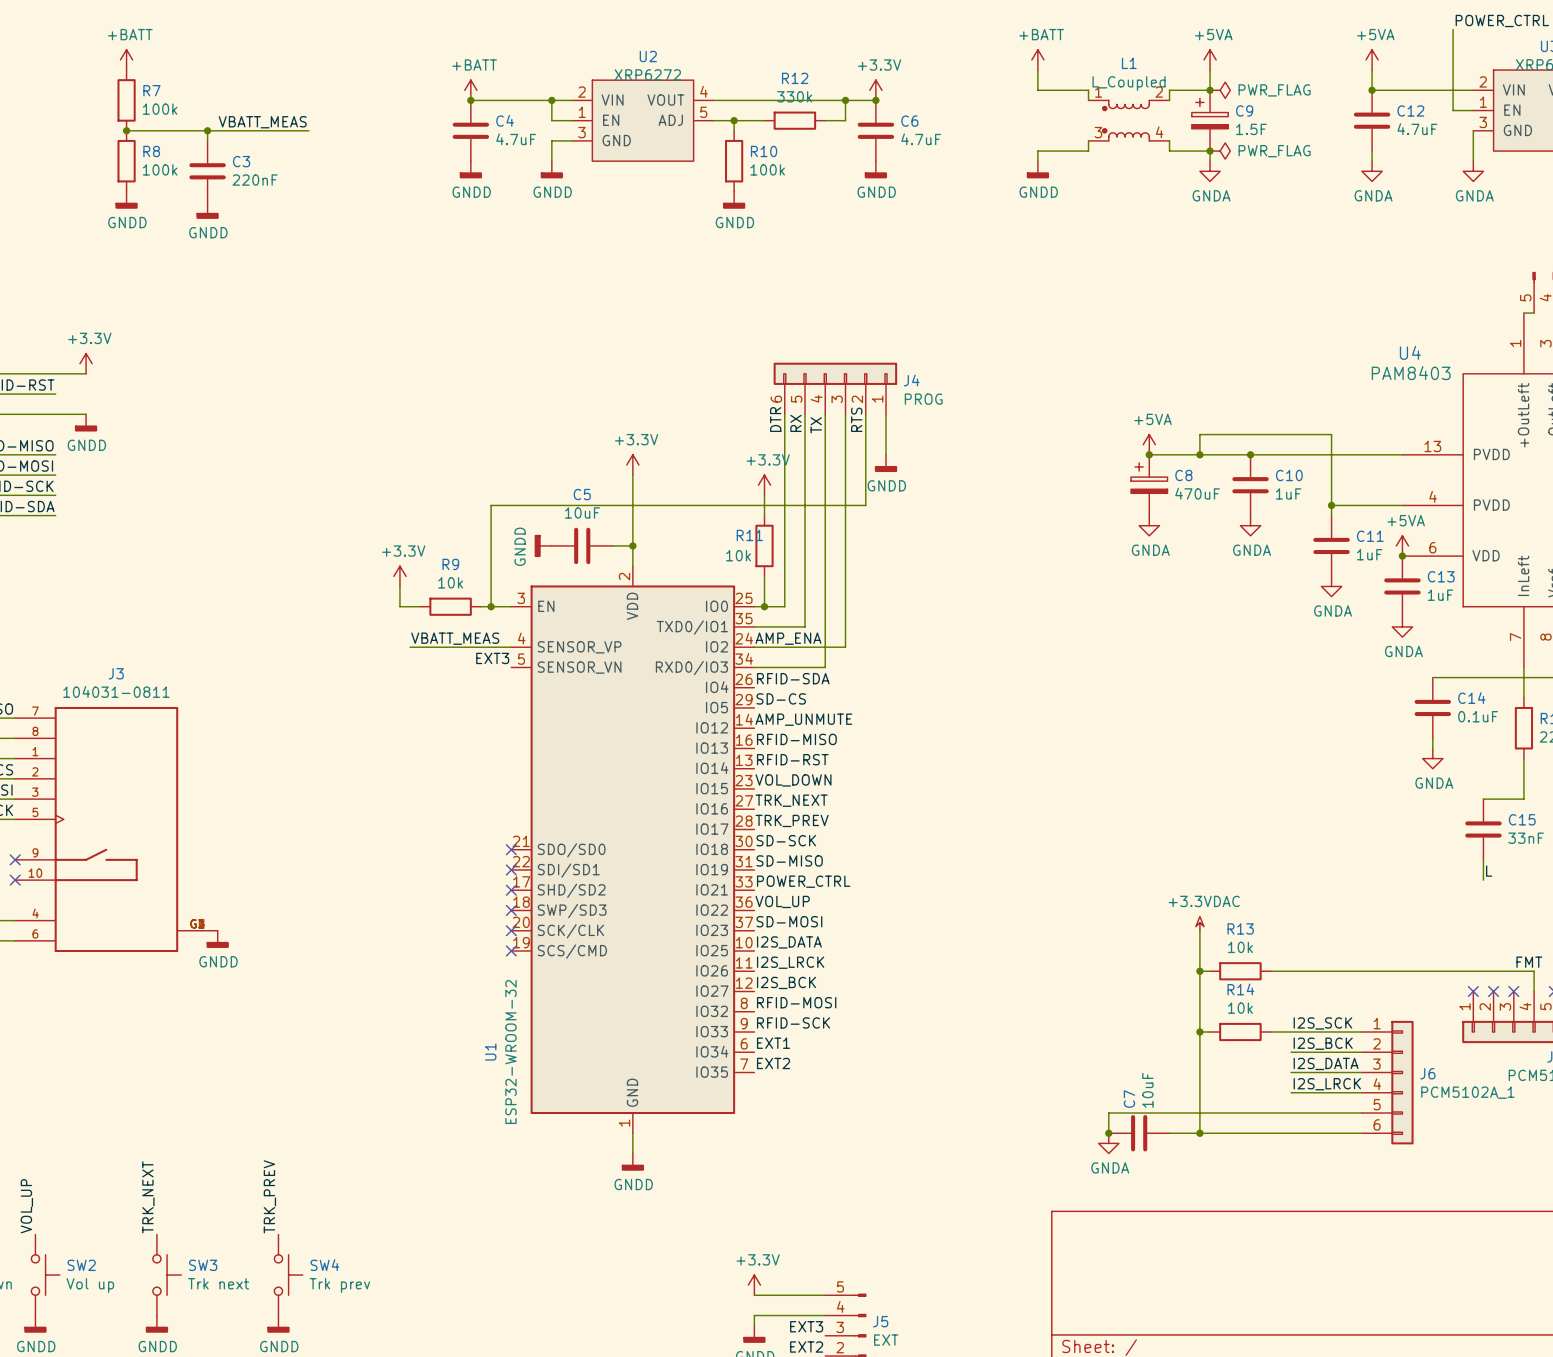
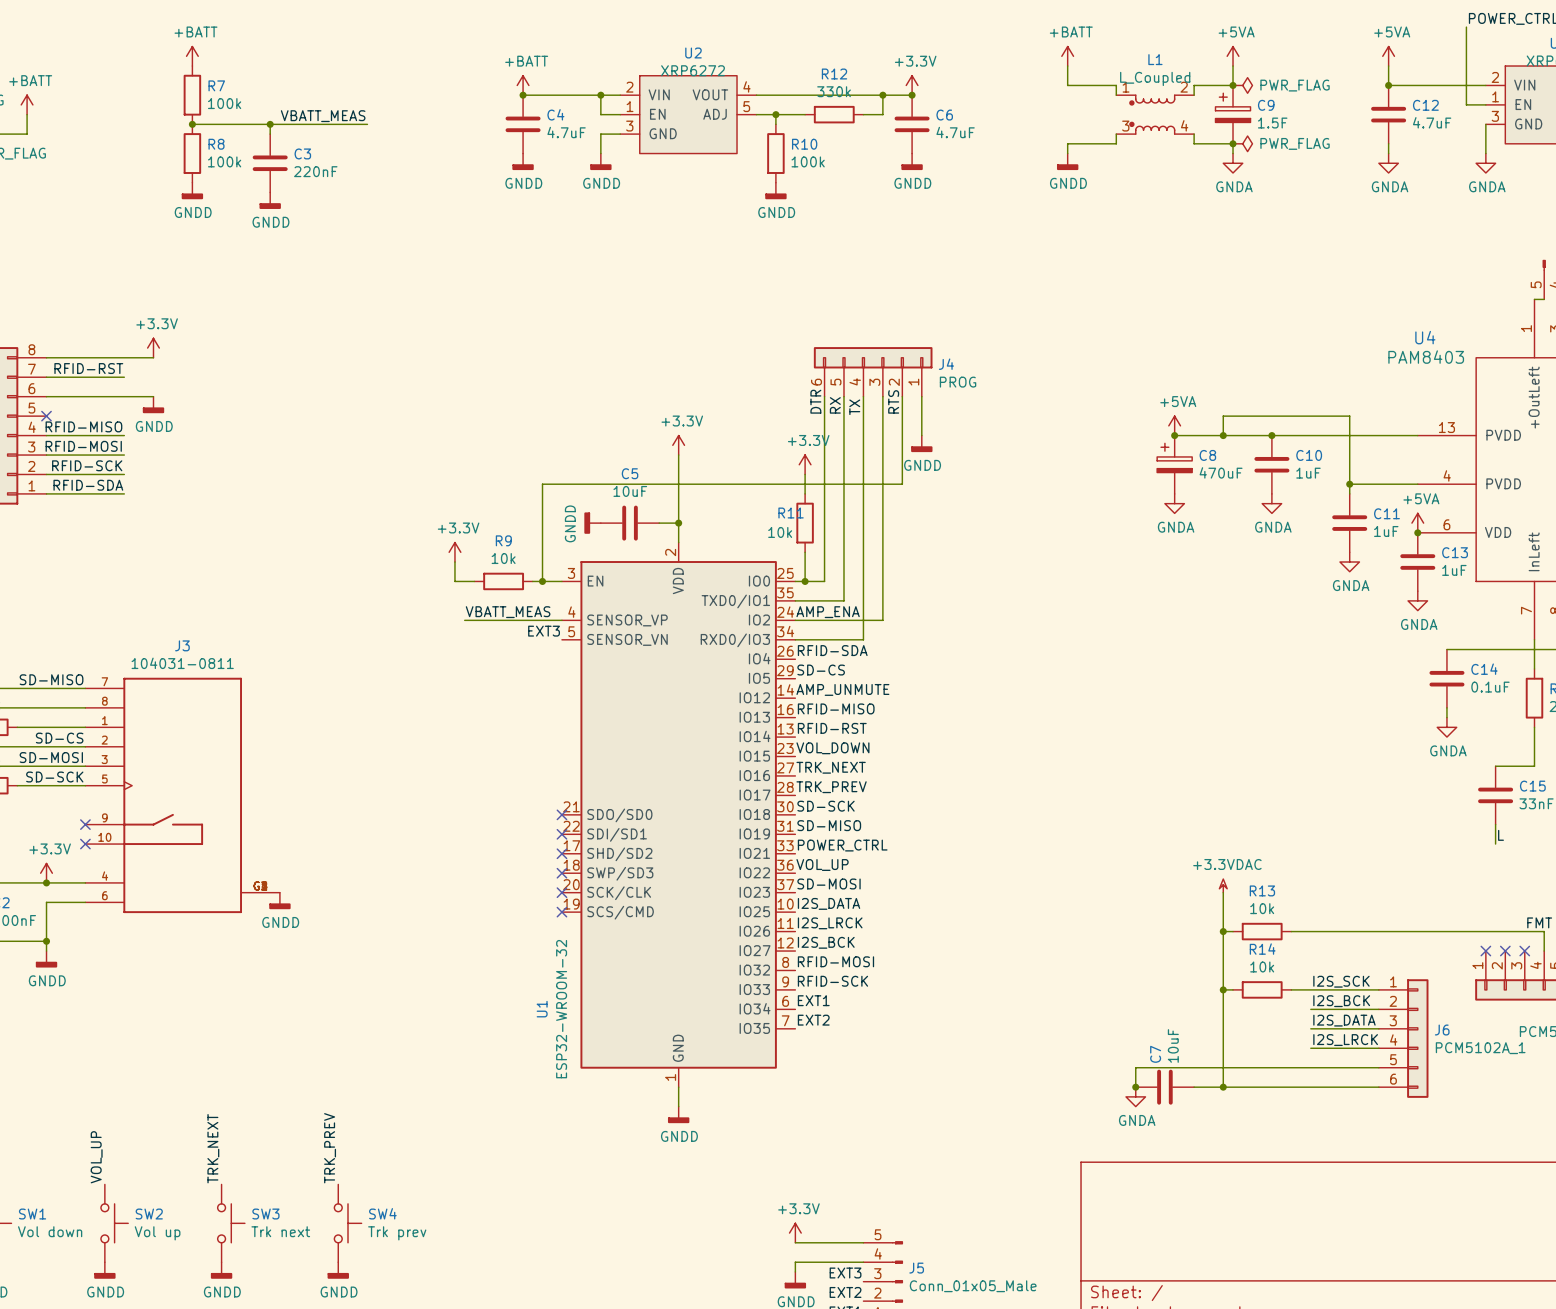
J5 value: EXT (886, 1340) -> Conn_01x05_Male (973, 1286)

